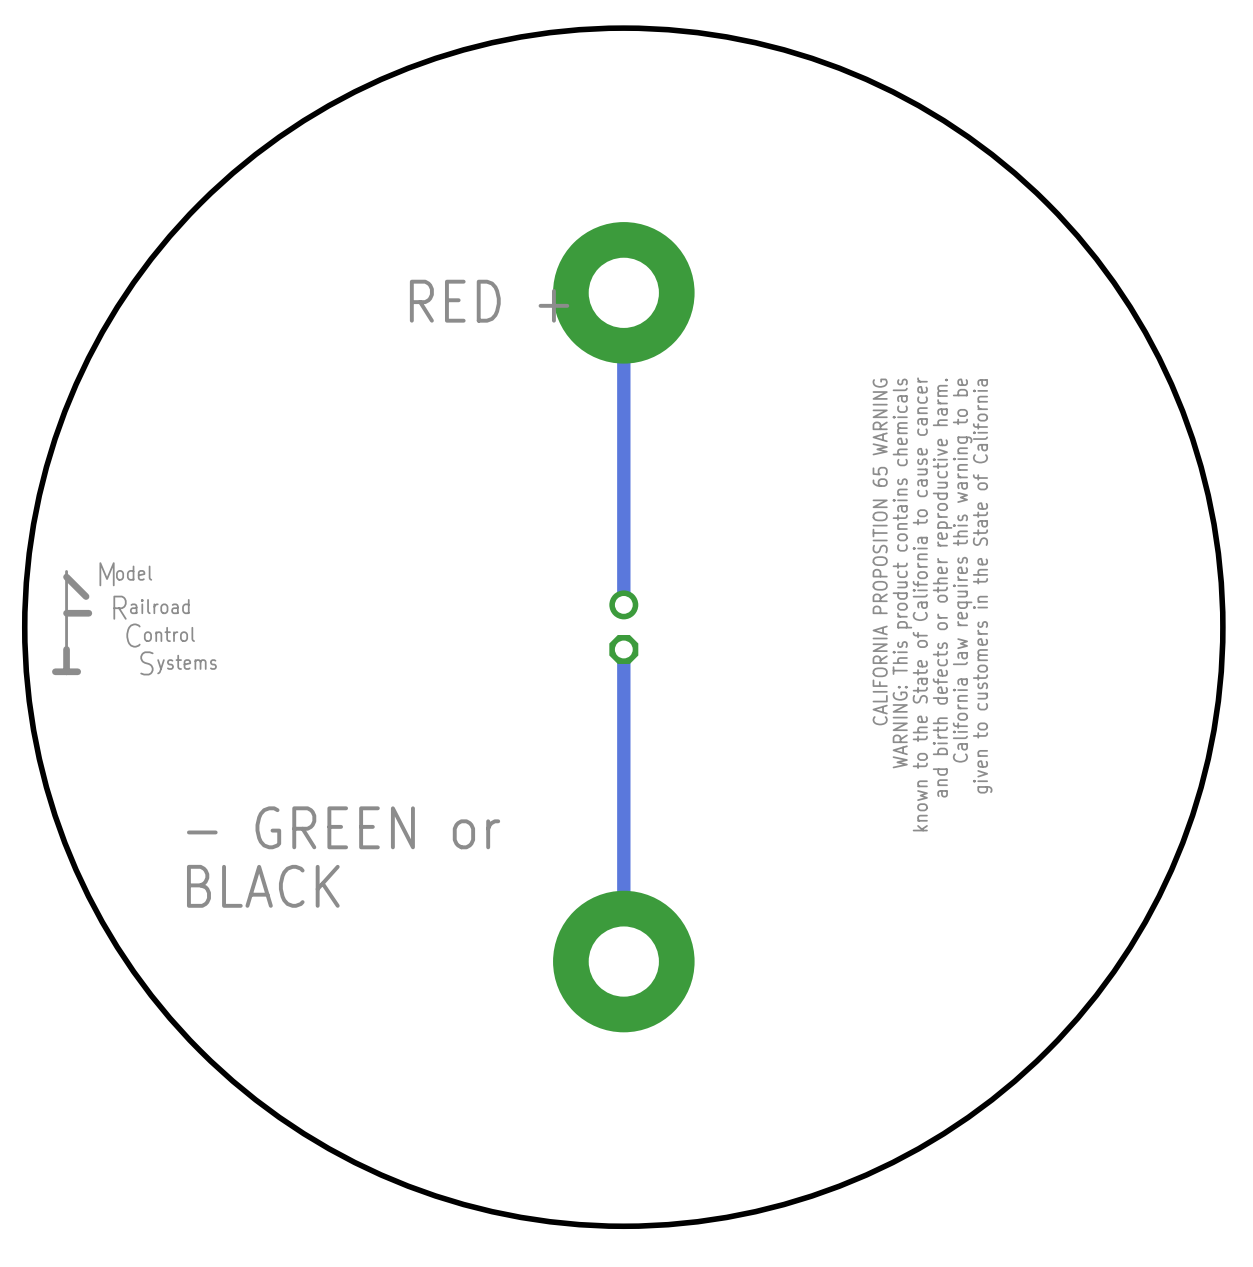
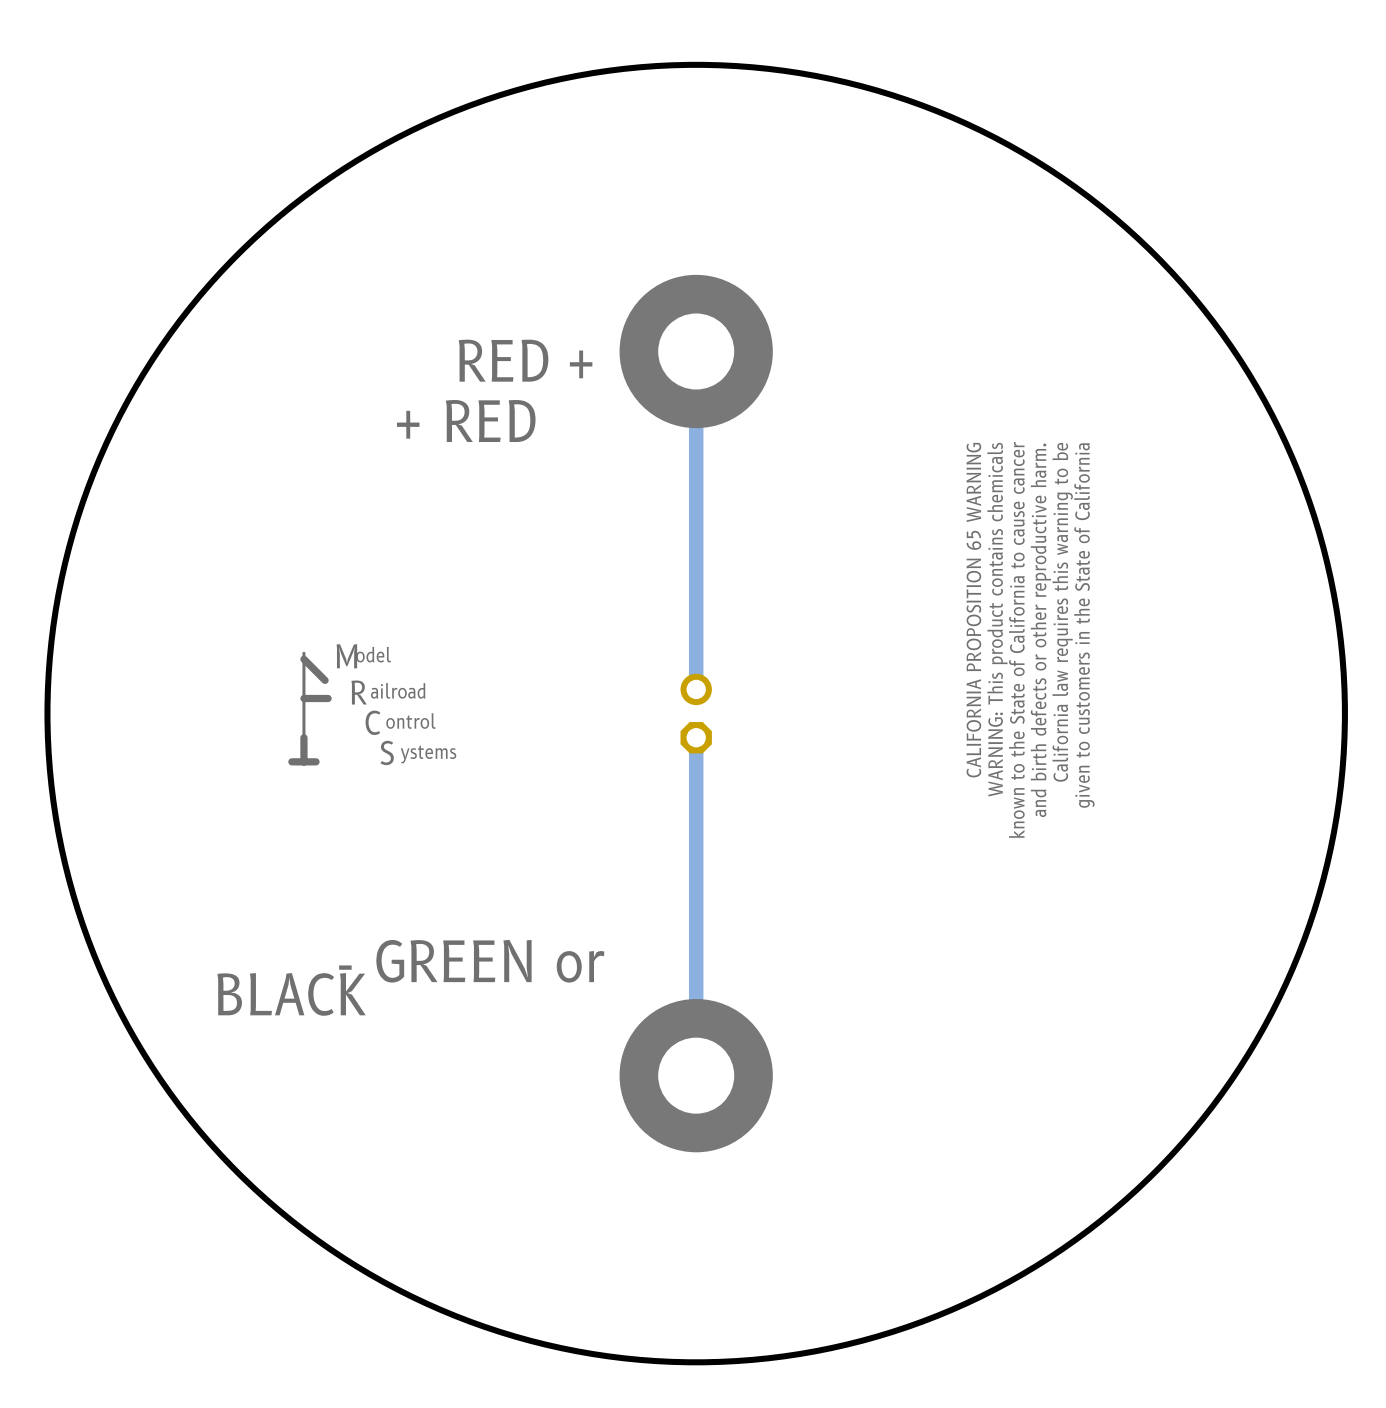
text: none -> + RED (466, 421)
drawing position: (72, 622) -> (309, 708)
text position: - GREEN or (343, 827) -> - GREEN or (471, 961)

